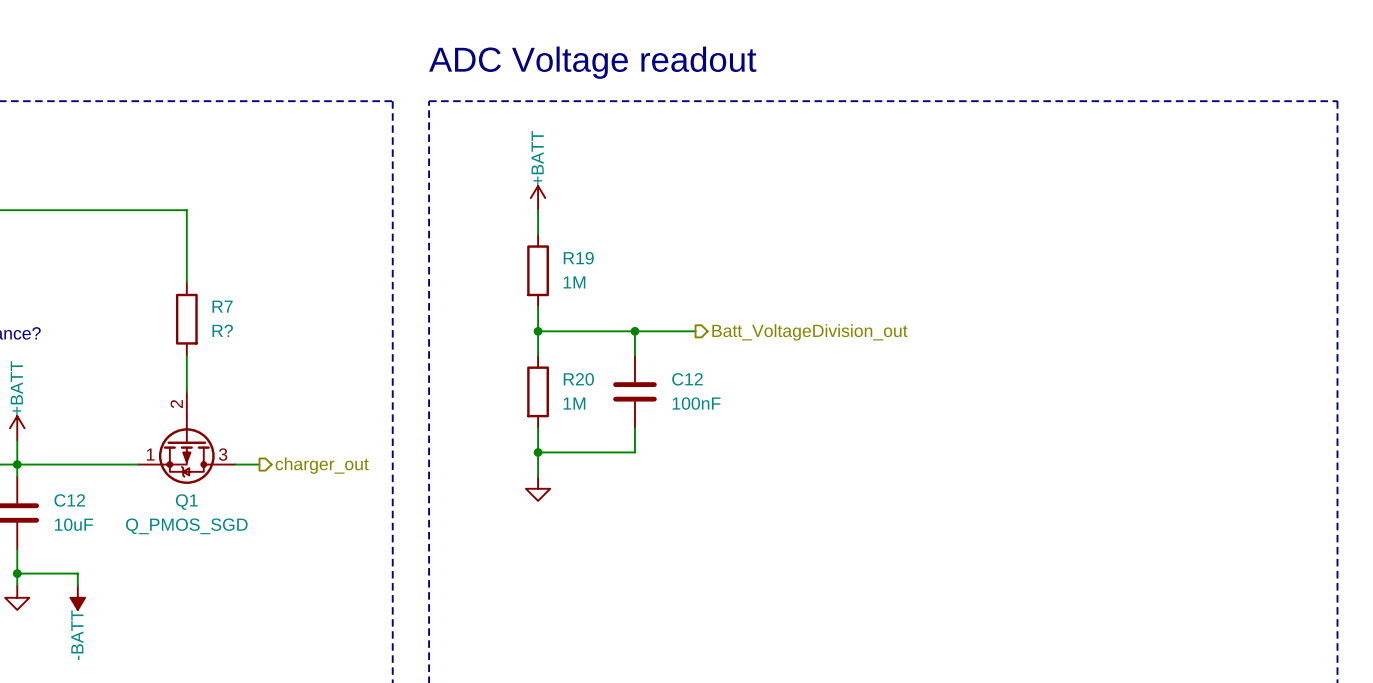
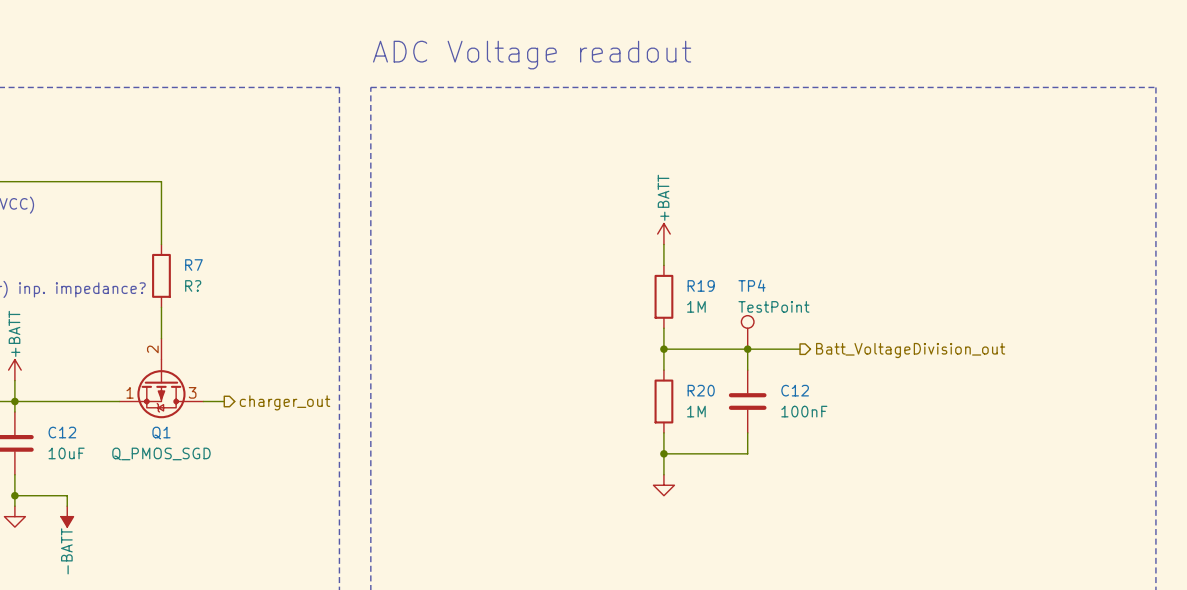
power symbol: +BATT (538, 198) -> none
wire: (538, 210) (538, 234) -> none
R19 position: (538, 270) -> (663, 296)
power symbol: none -> +BATT (663, 234)
wire: (538, 307) (538, 355) -> none
wire: (538, 331) (695, 331) -> none
junction: (538, 331) -> none
wire: (634, 331) (634, 355) -> (663, 244) (663, 265)
junction: (634, 331) -> none
hierarchical label: Batt_VoltageDivision_out (809, 332) -> none
TP4: none -> TestPoint (747, 332)
R20 position: (538, 391) -> (663, 401)
C12: 100nF (634, 391) -> none
wire: none -> (663, 349) (800, 349)
junction: none -> (663, 349)
wire: none -> (747, 349) (747, 370)
junction: none -> (747, 349)
hierarchical label: none -> Batt_VoltageDivision_out (910, 350)
wire: (538, 428) (538, 476) -> (663, 328) (663, 370)
wire: (634, 428) (634, 452) (538, 452) -> none
junction: (538, 452) -> none
C12: none -> 100nF (747, 401)
power symbol: (538, 488) -> none
wire: none -> (663, 432) (663, 474)
wire: none -> (747, 432) (747, 453) (663, 453)
junction: none -> (663, 453)
power symbol: none -> (663, 485)

